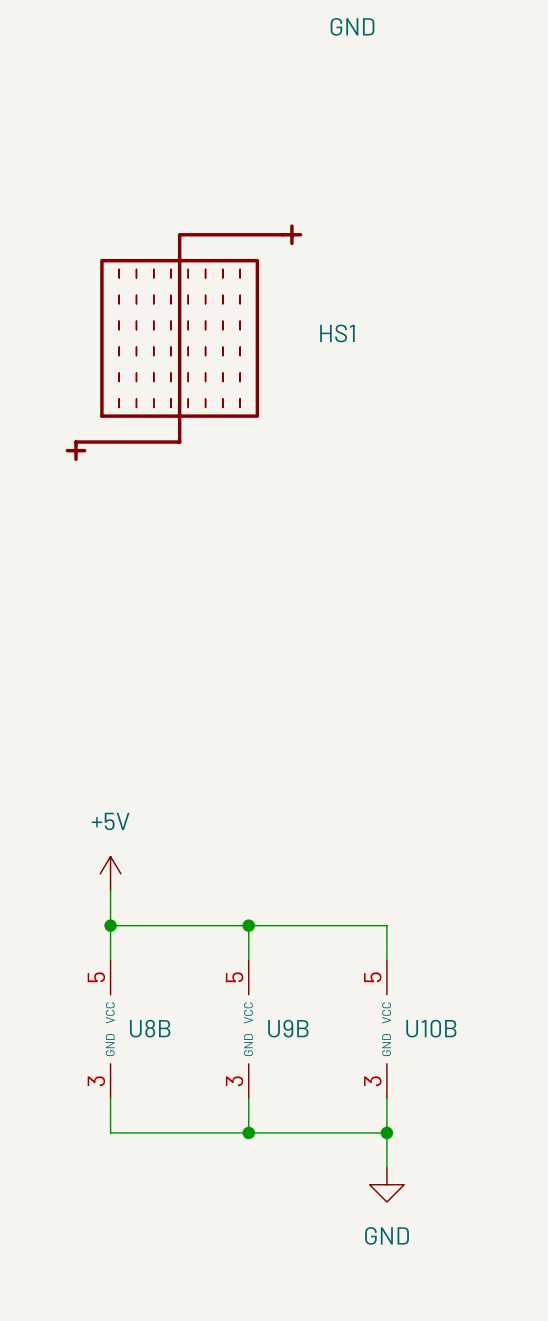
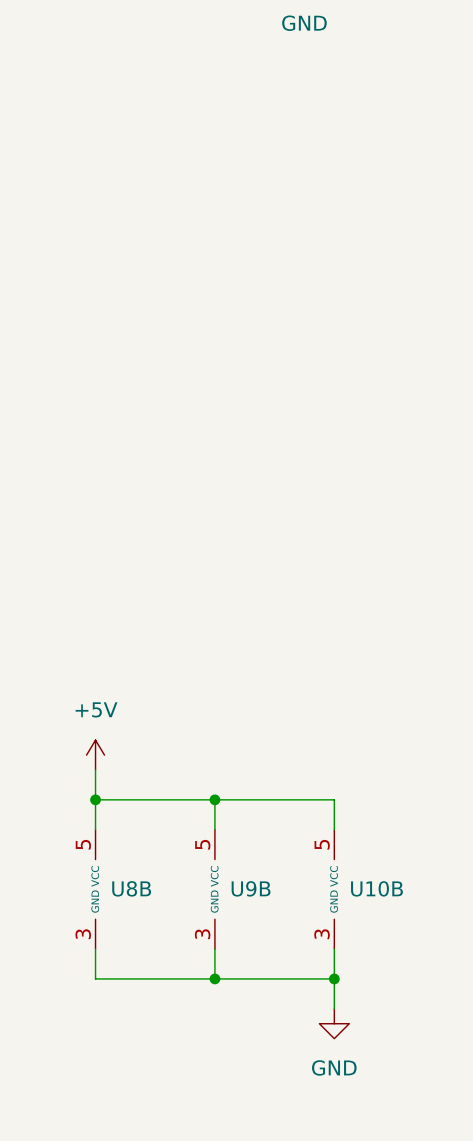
HS1: (183, 342) -> none

